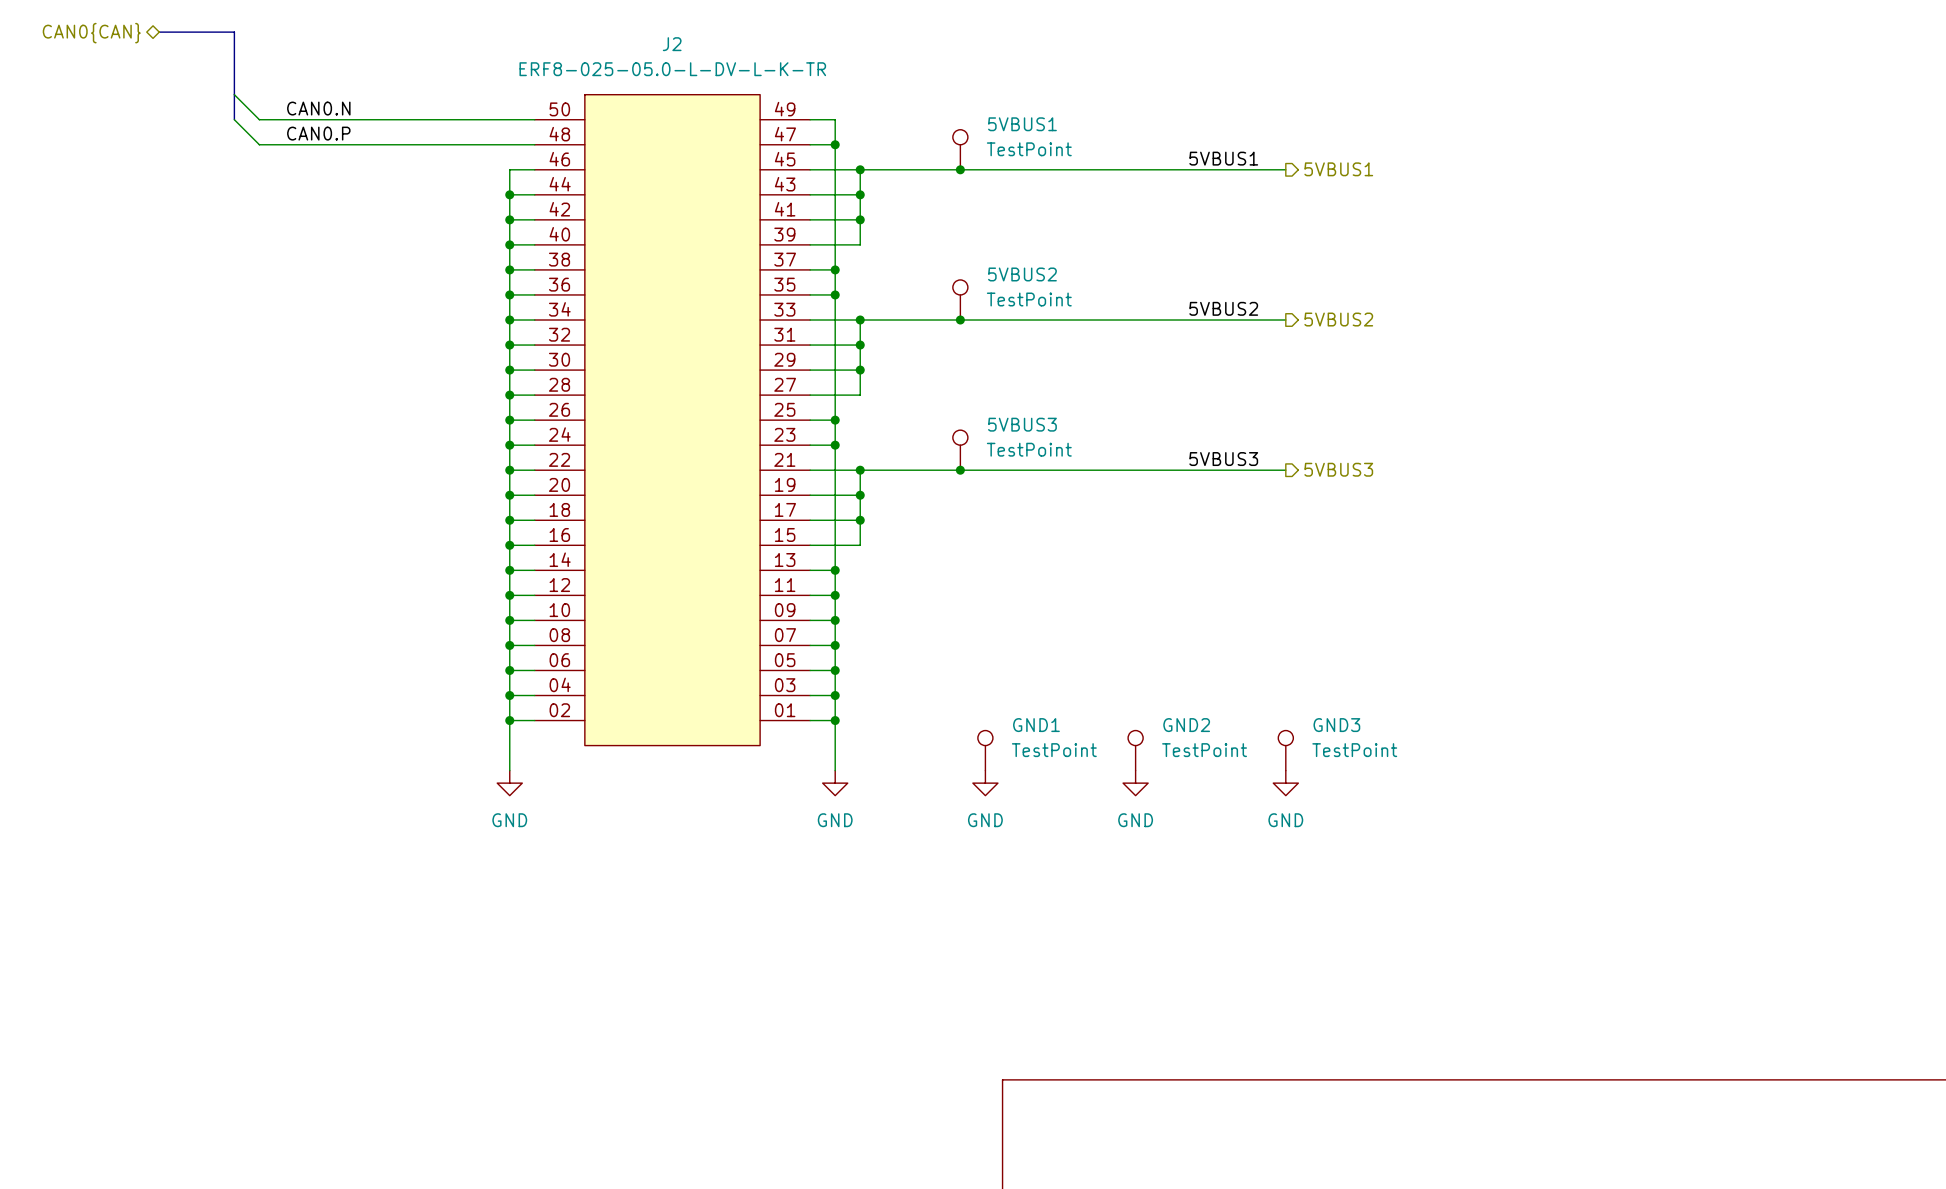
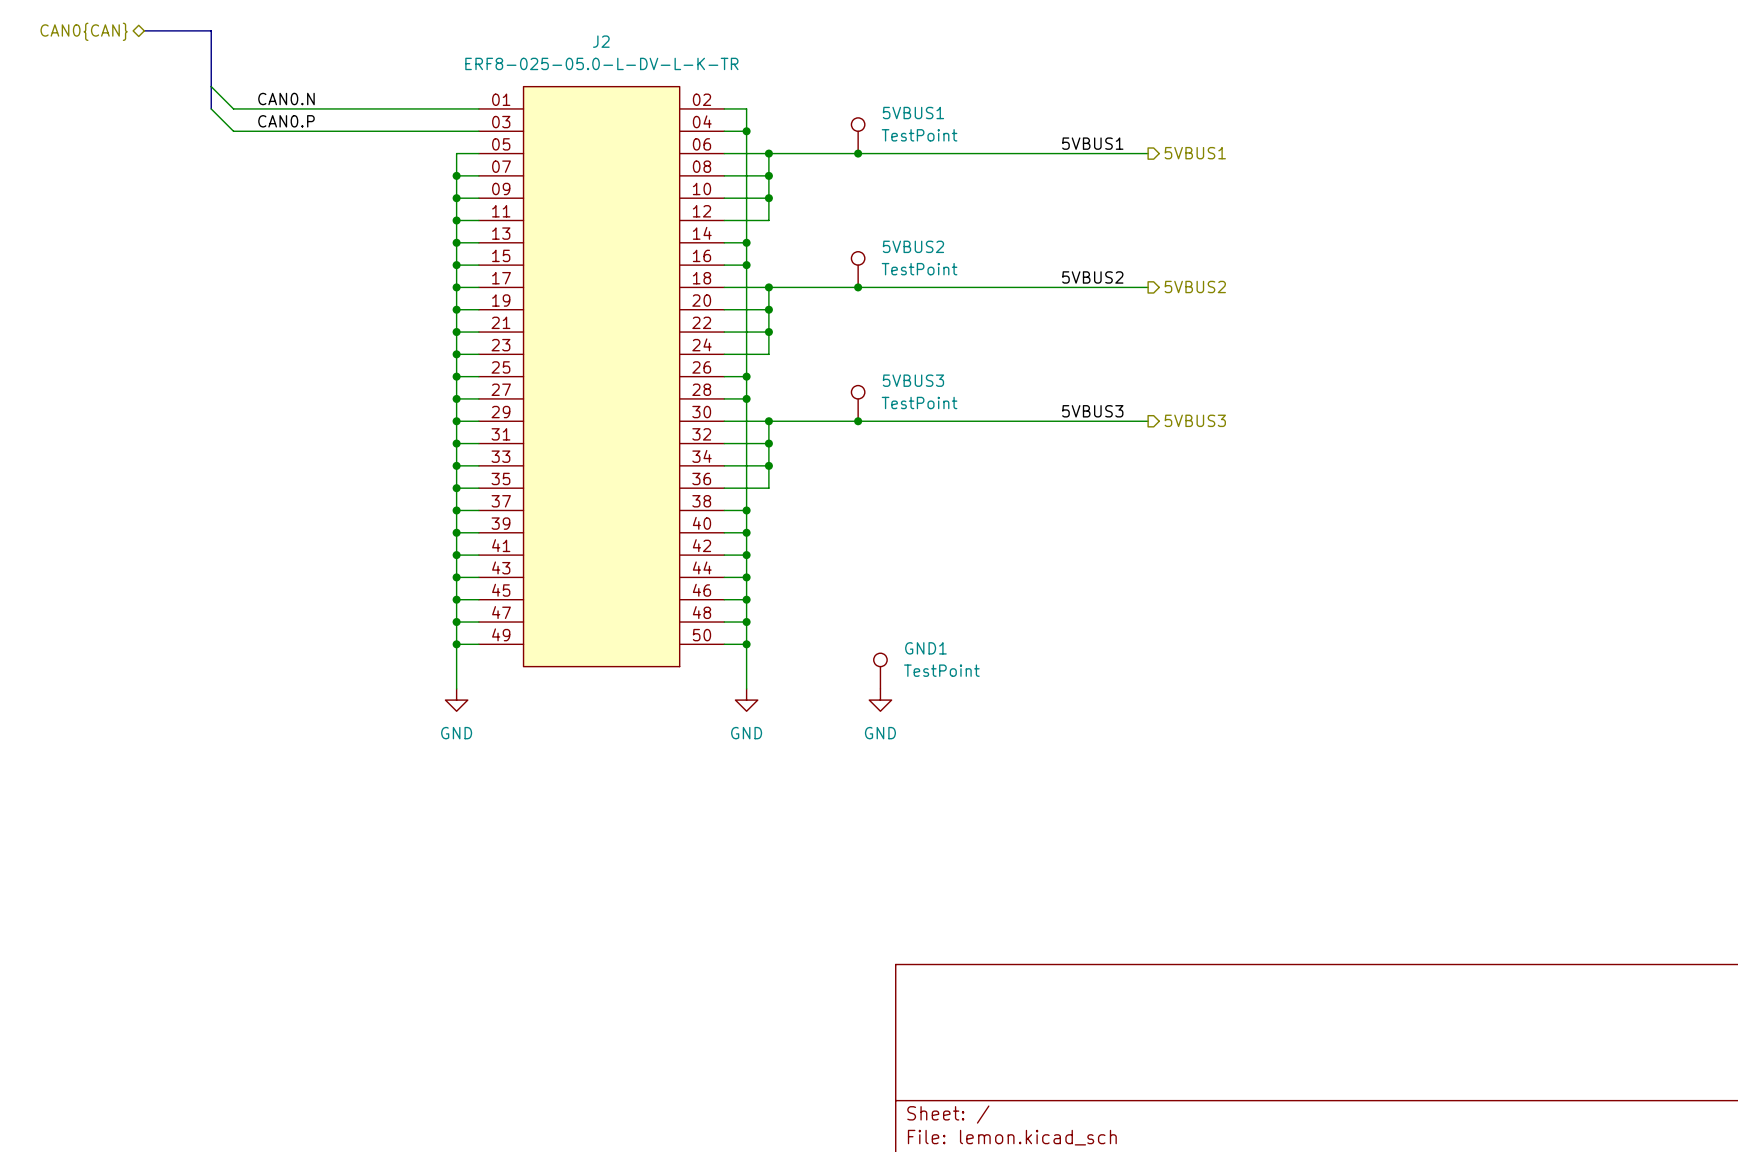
J2 rotation: 0° (672, 420) -> 180° (601, 376)
GND2: TestPoint (1135, 750) -> none
GND3: TestPoint (1285, 750) -> none
power symbol: GND (1135, 783) -> none
power symbol: GND (1285, 783) -> none

